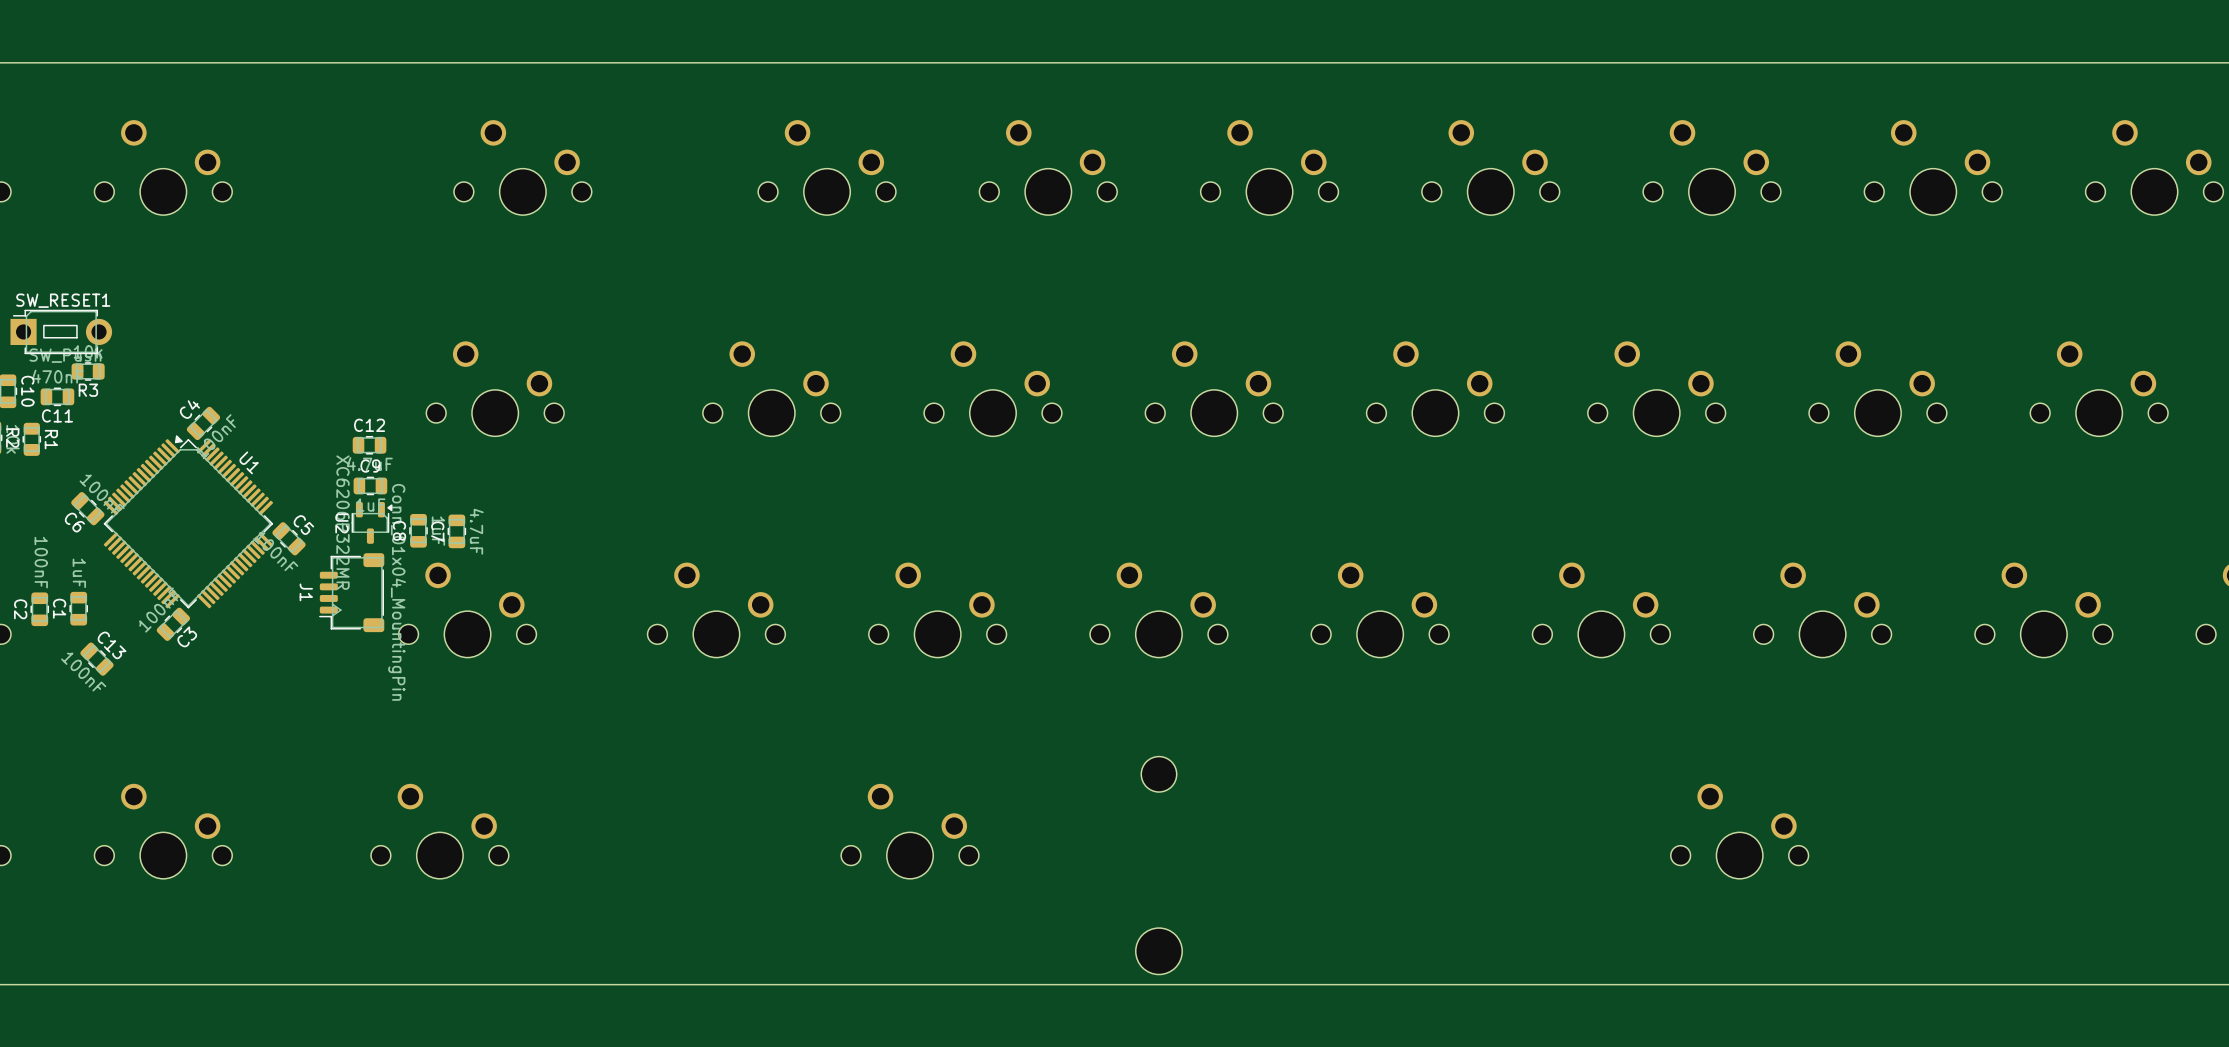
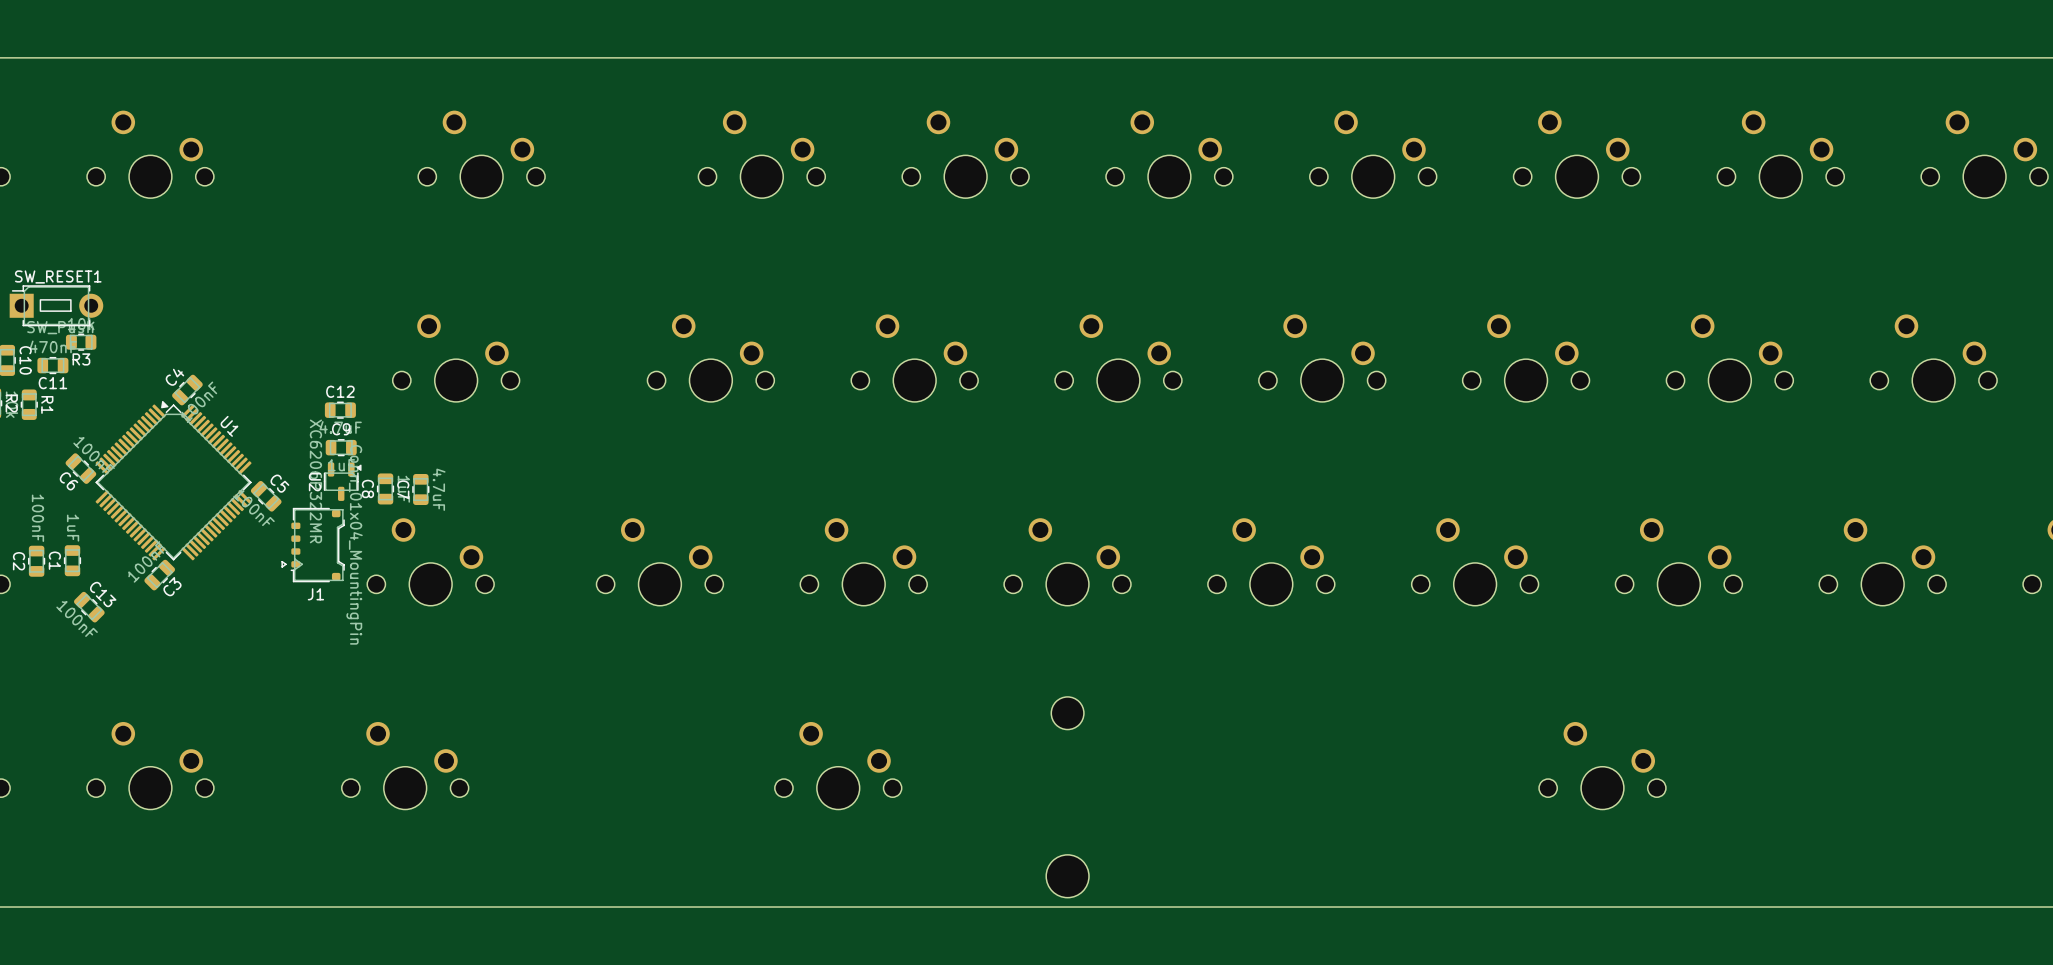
J1 footprint: [319, 553, 385, 633] -> [281, 507, 345, 583]
J1 name position: J1 (306, 592) -> J1 (315, 594)

